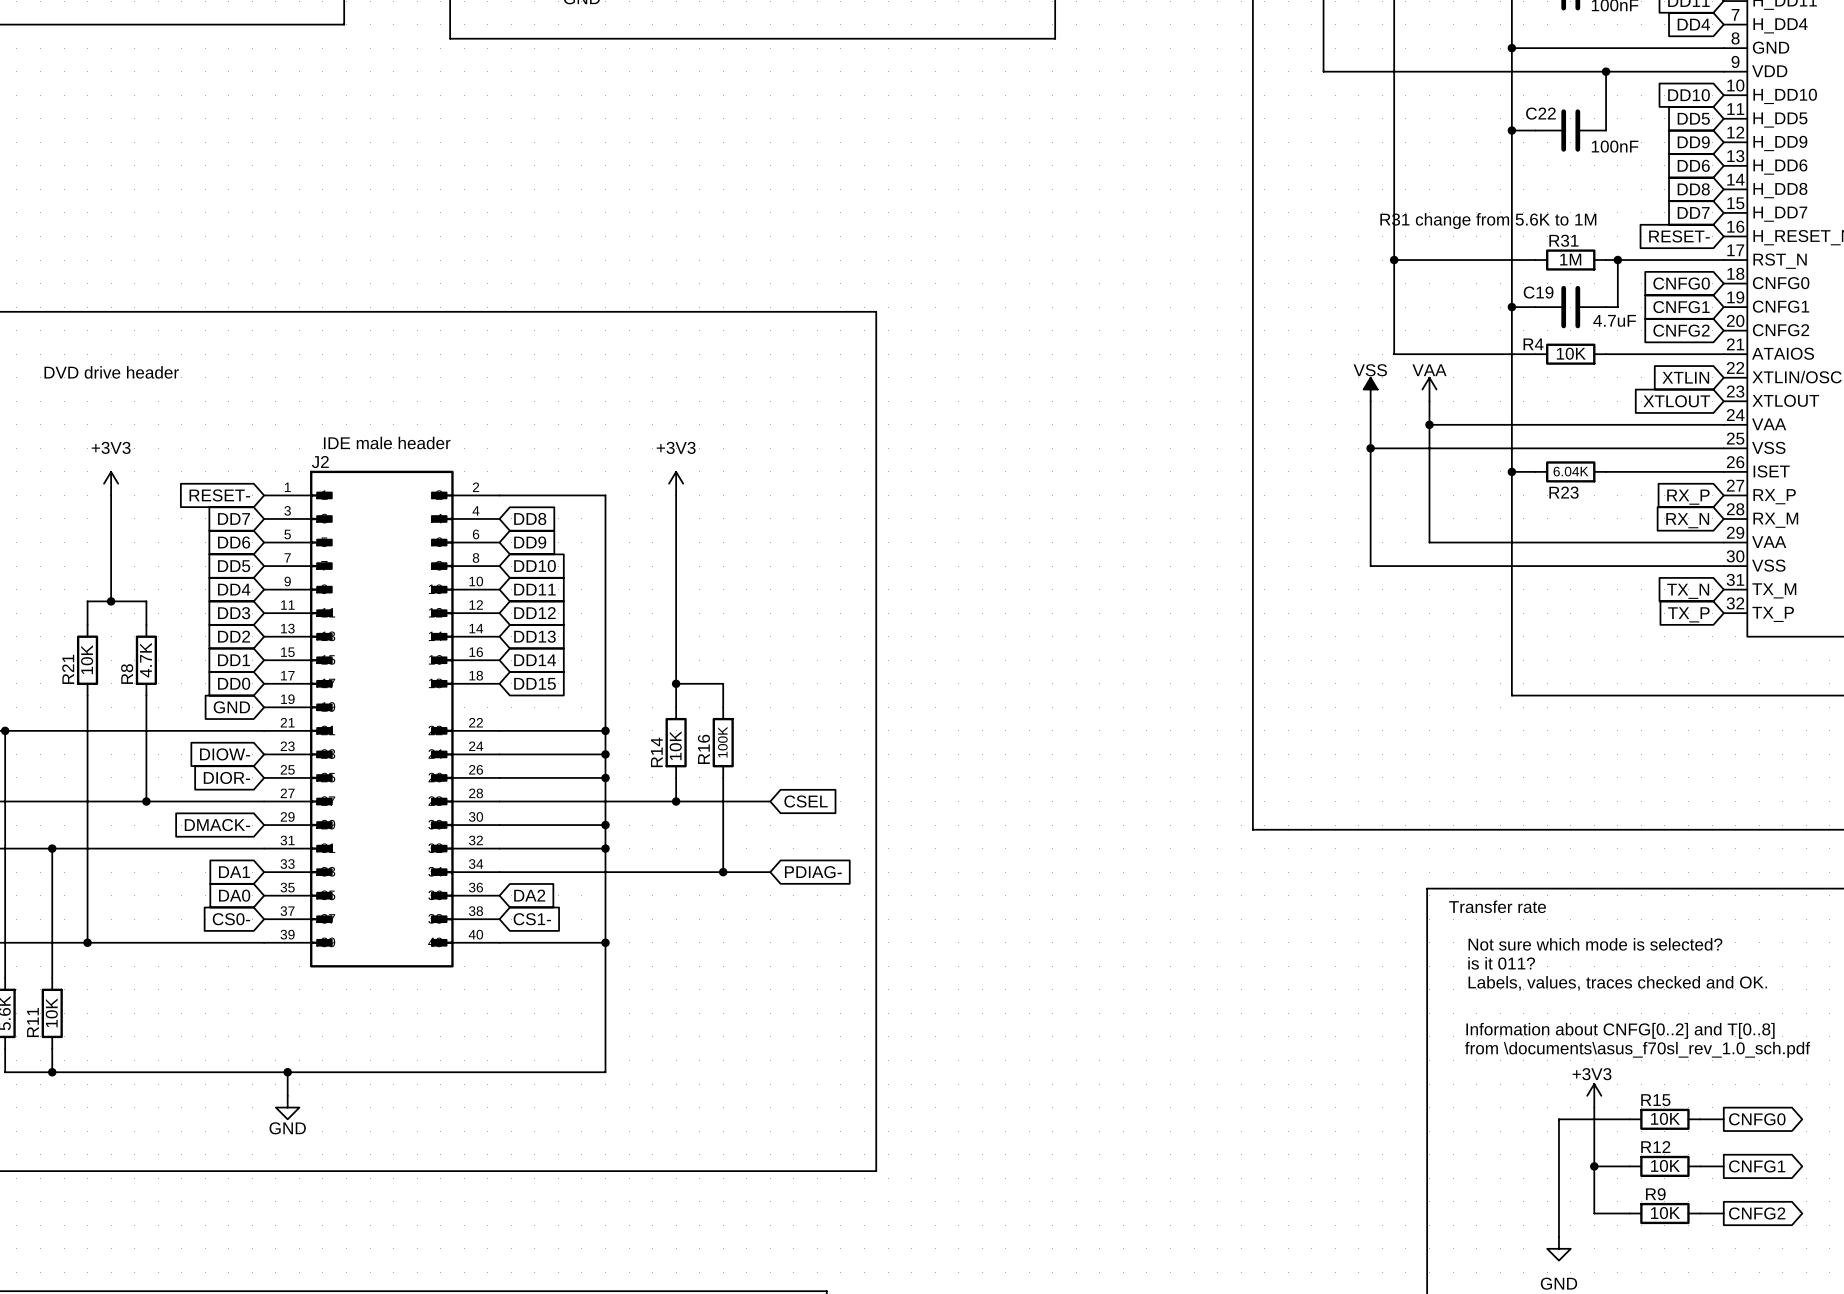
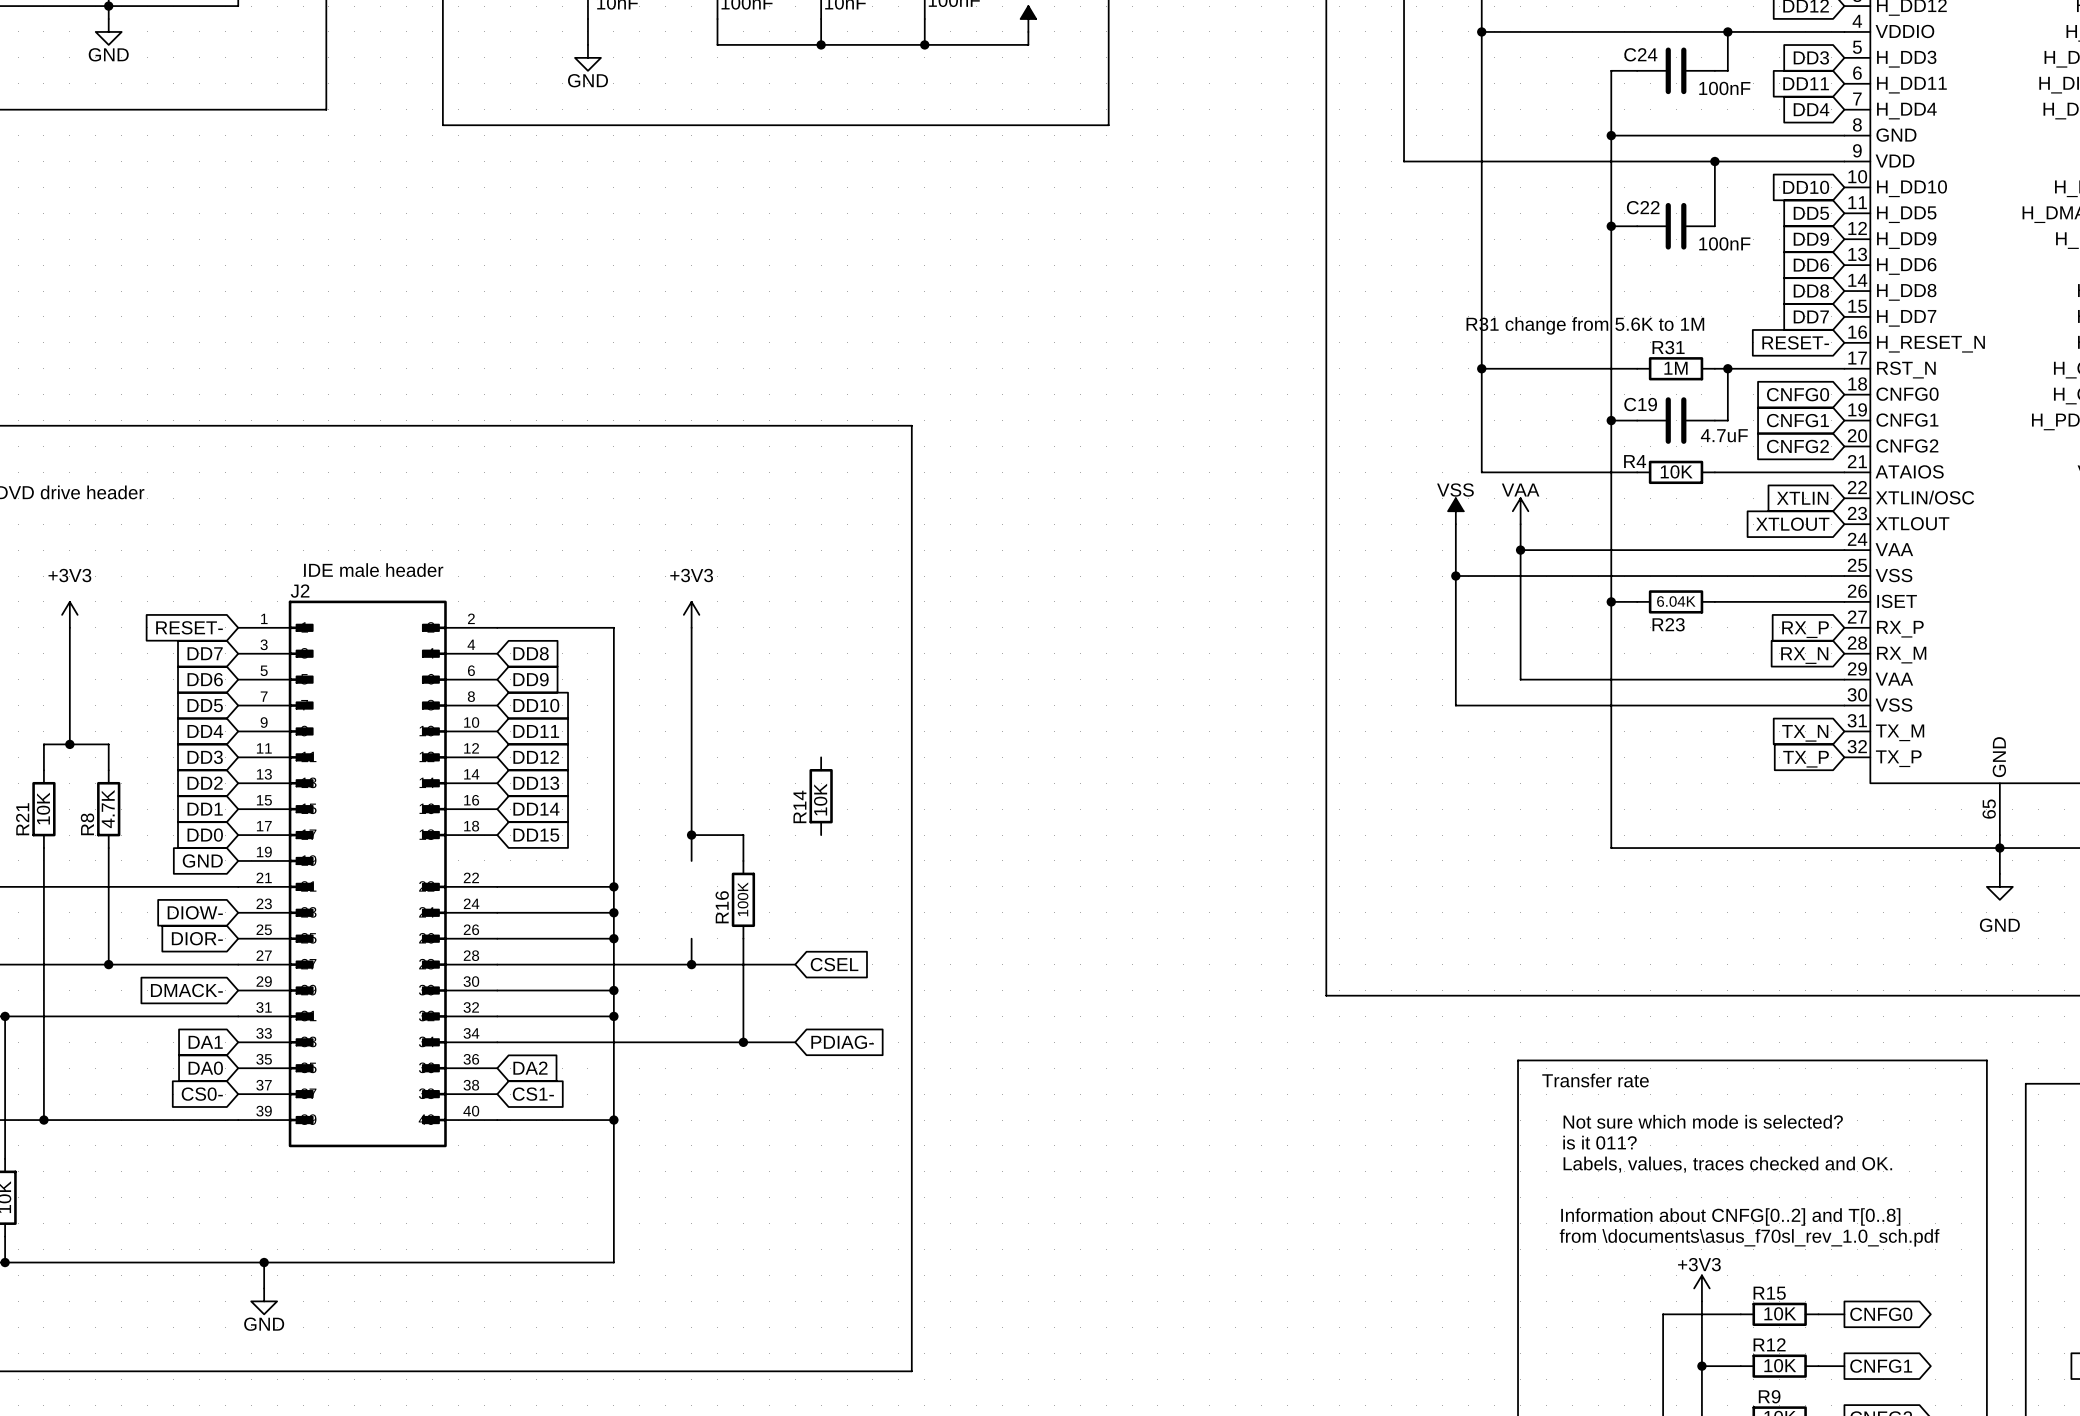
R14 position: (676, 742) -> (821, 796)

